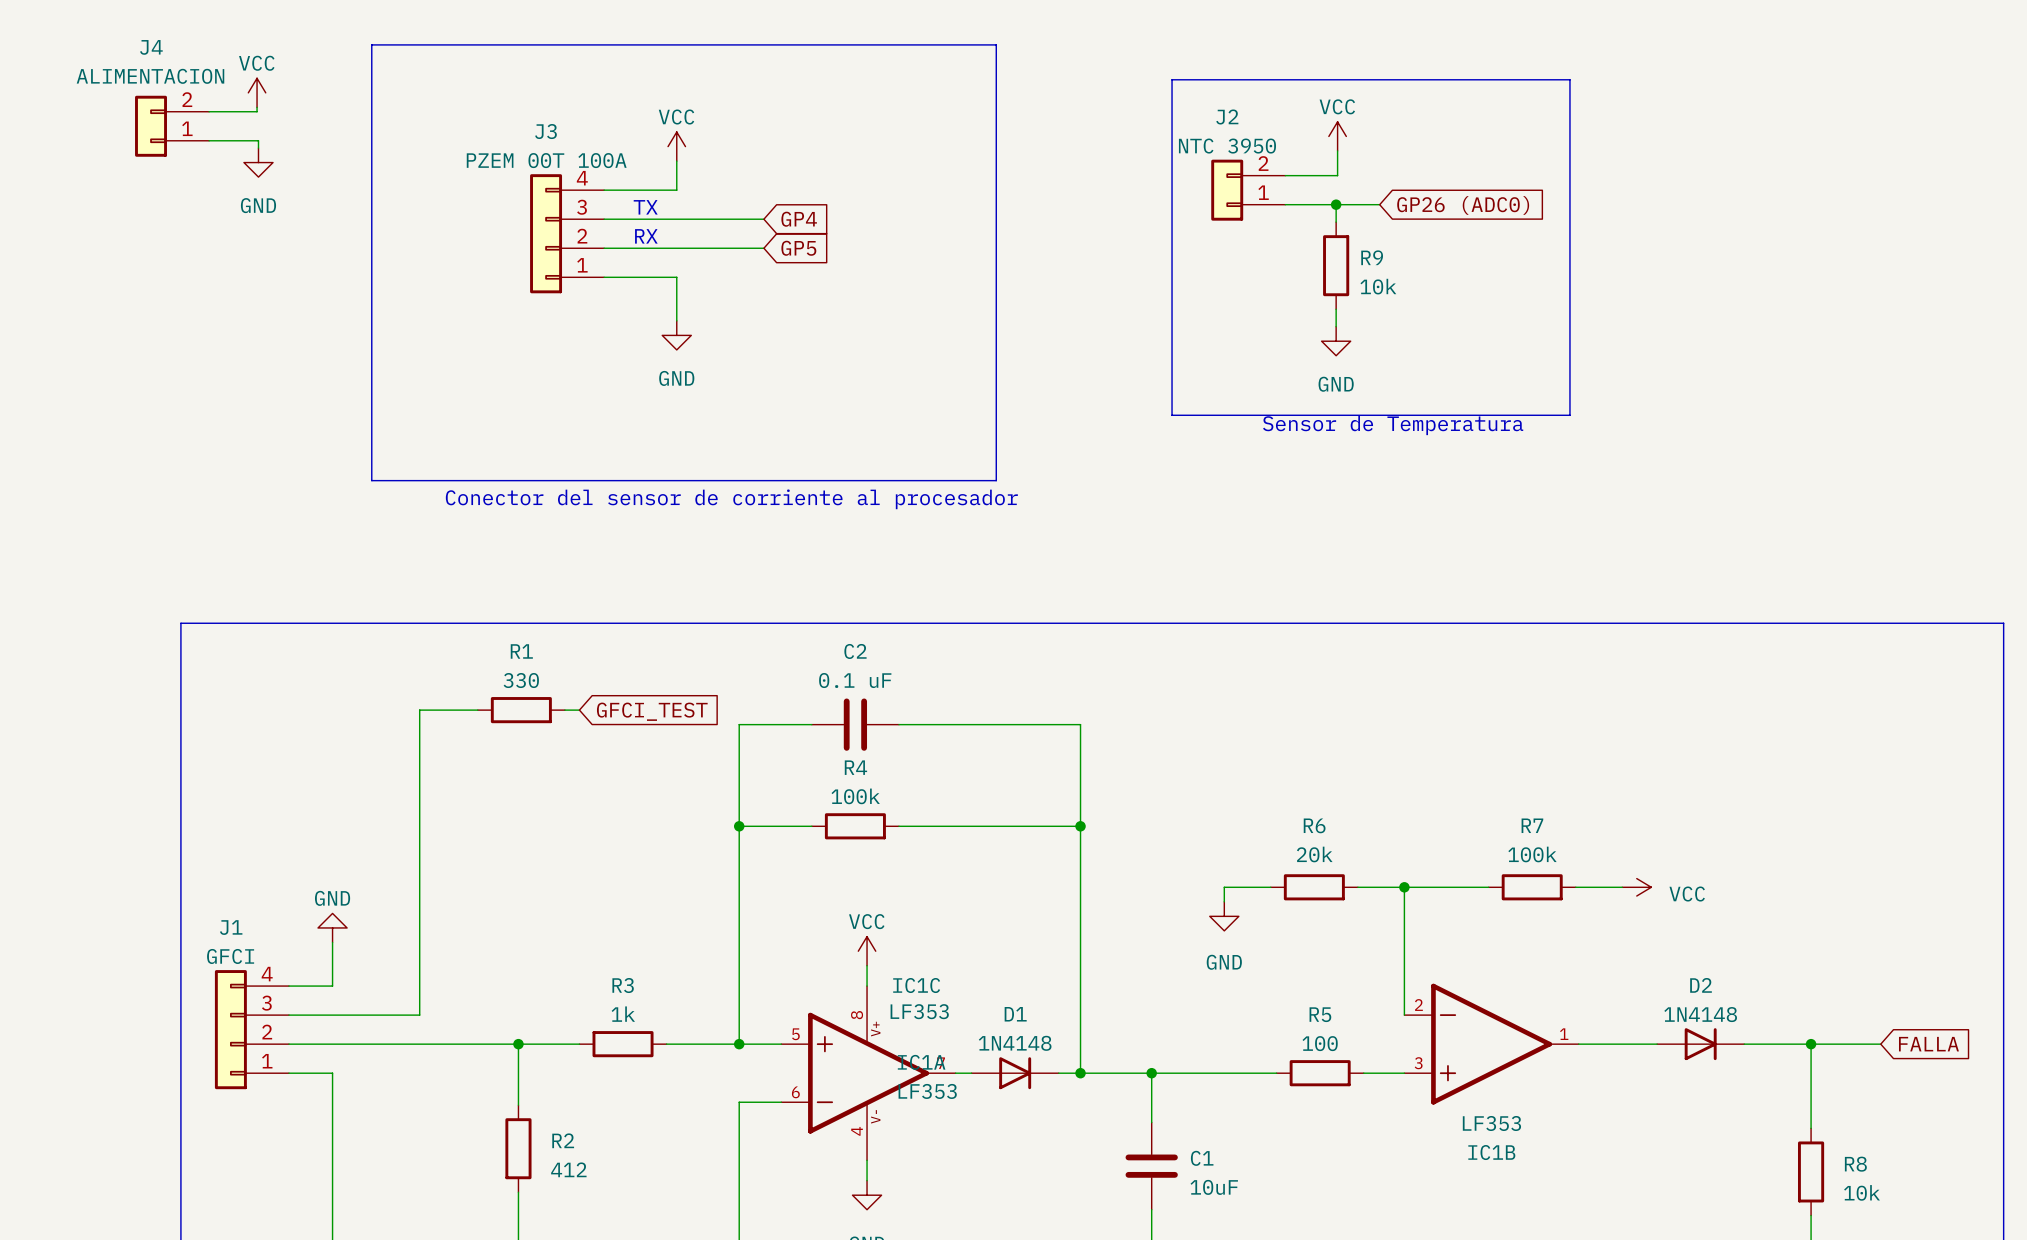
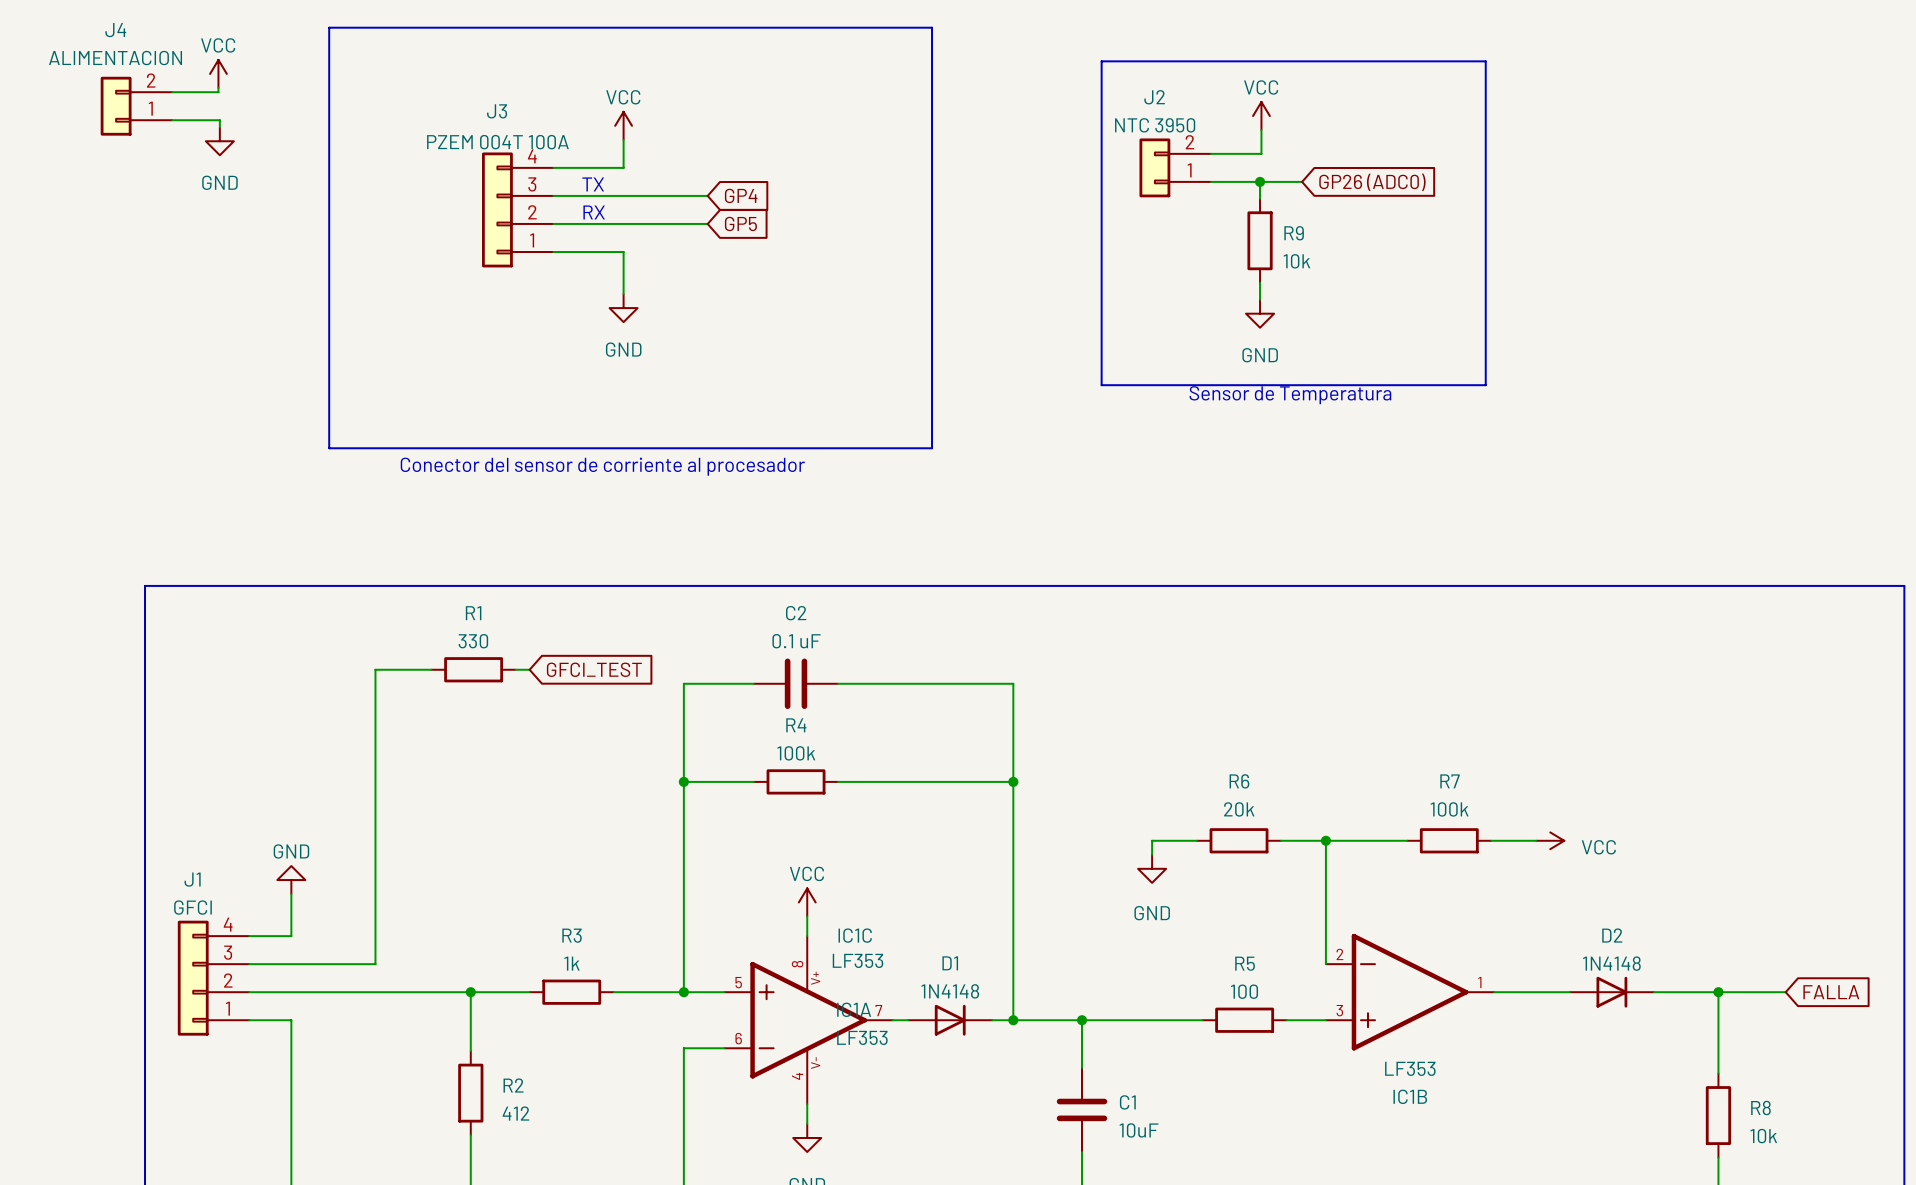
J3 value: PZEM 00T 100A (546, 160) -> PZEM 004T 100A (497, 142)

